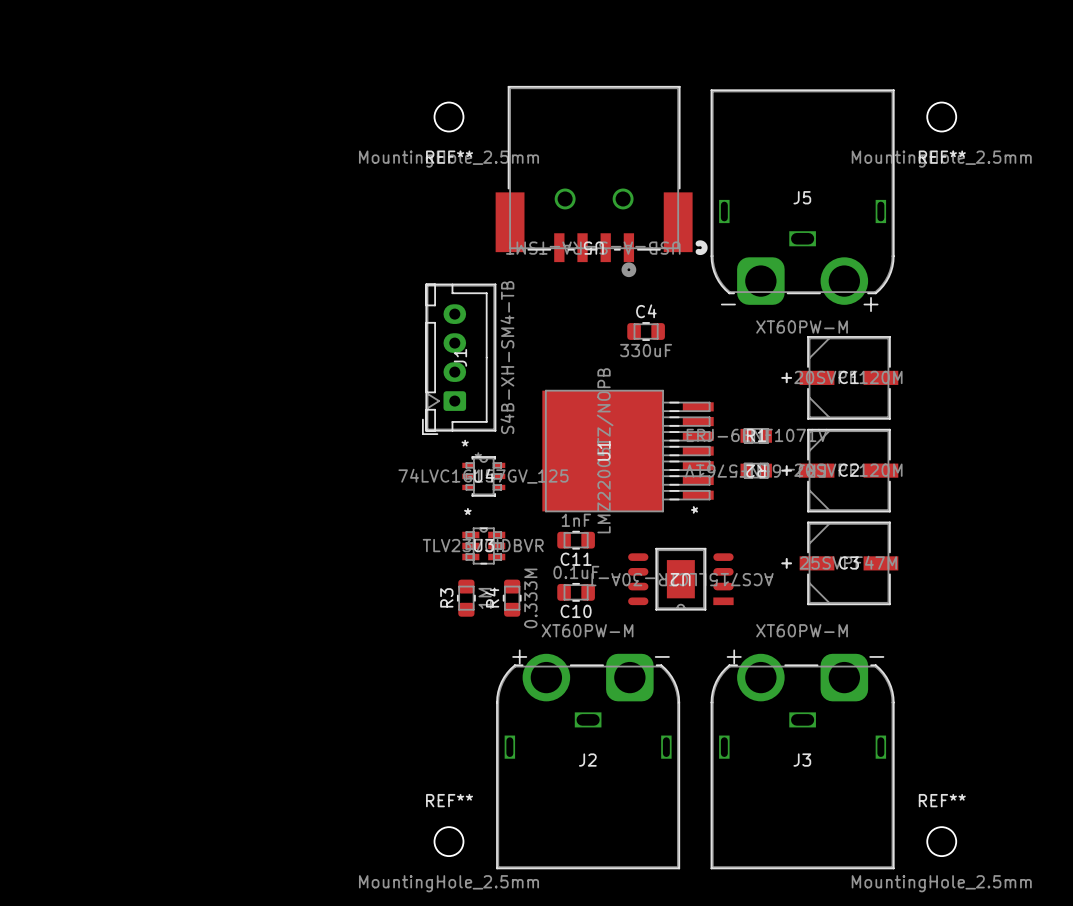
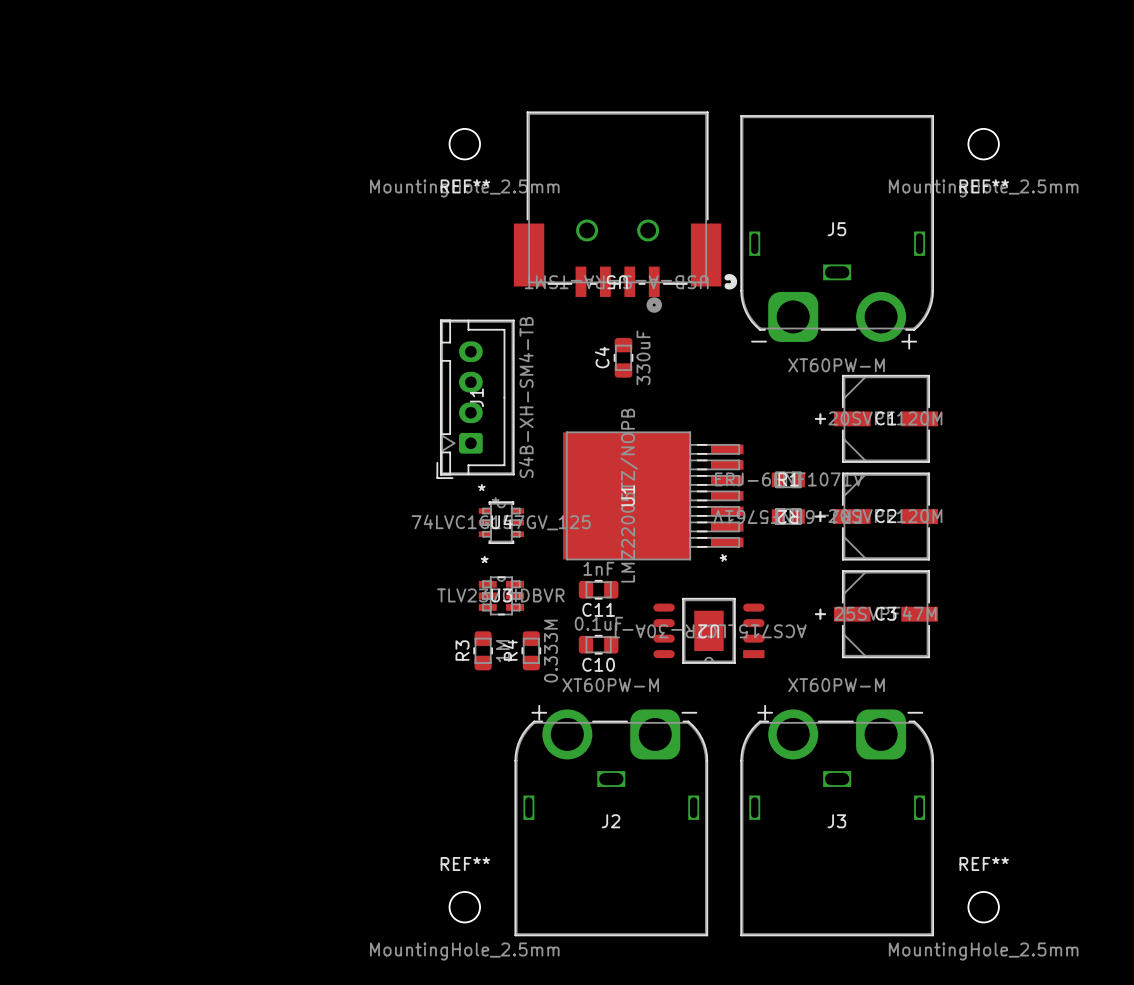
C4 name position: C4 (646, 311) -> C4 (602, 357)
C4 rotation: 0° (646, 331) -> 90° clockwise (623, 357)
C4 position: (646, 331) -> (623, 357)
C4 value position: 330uF (646, 350) -> 330uF (643, 357)

